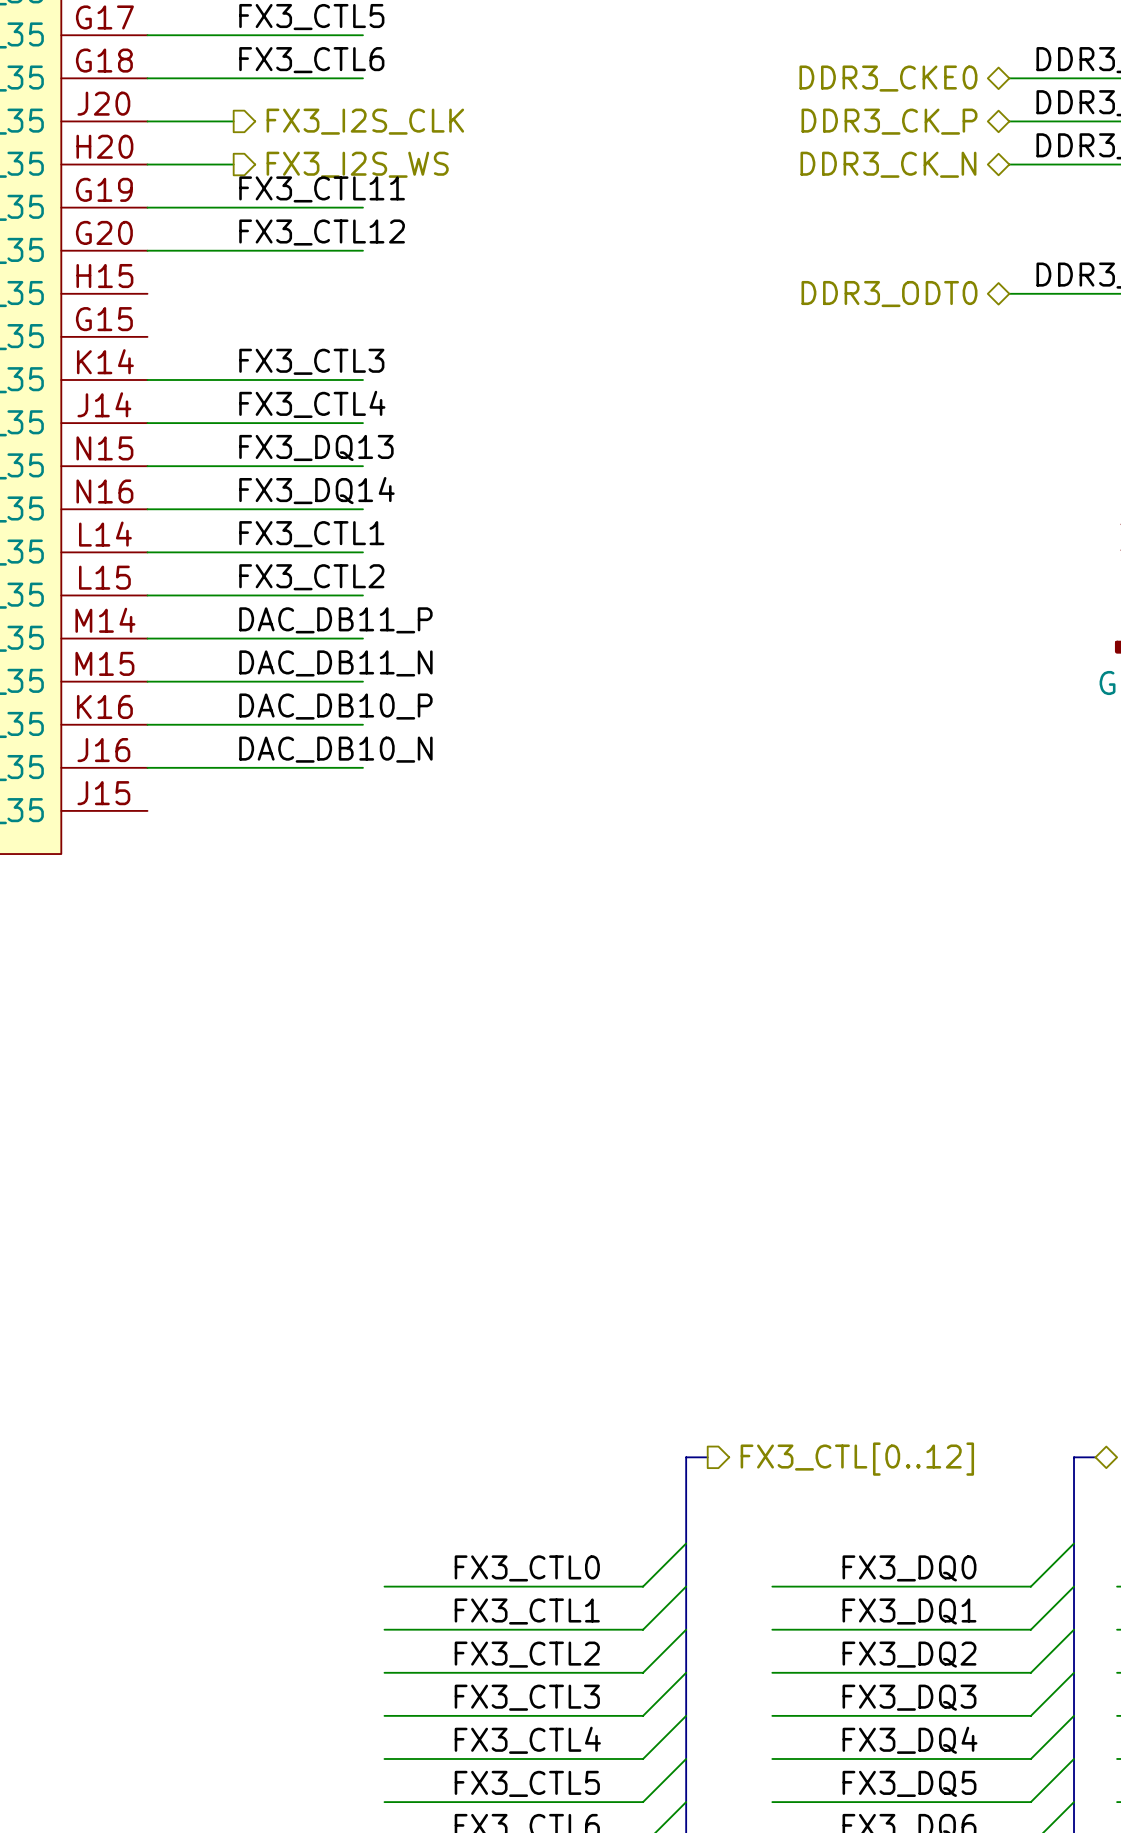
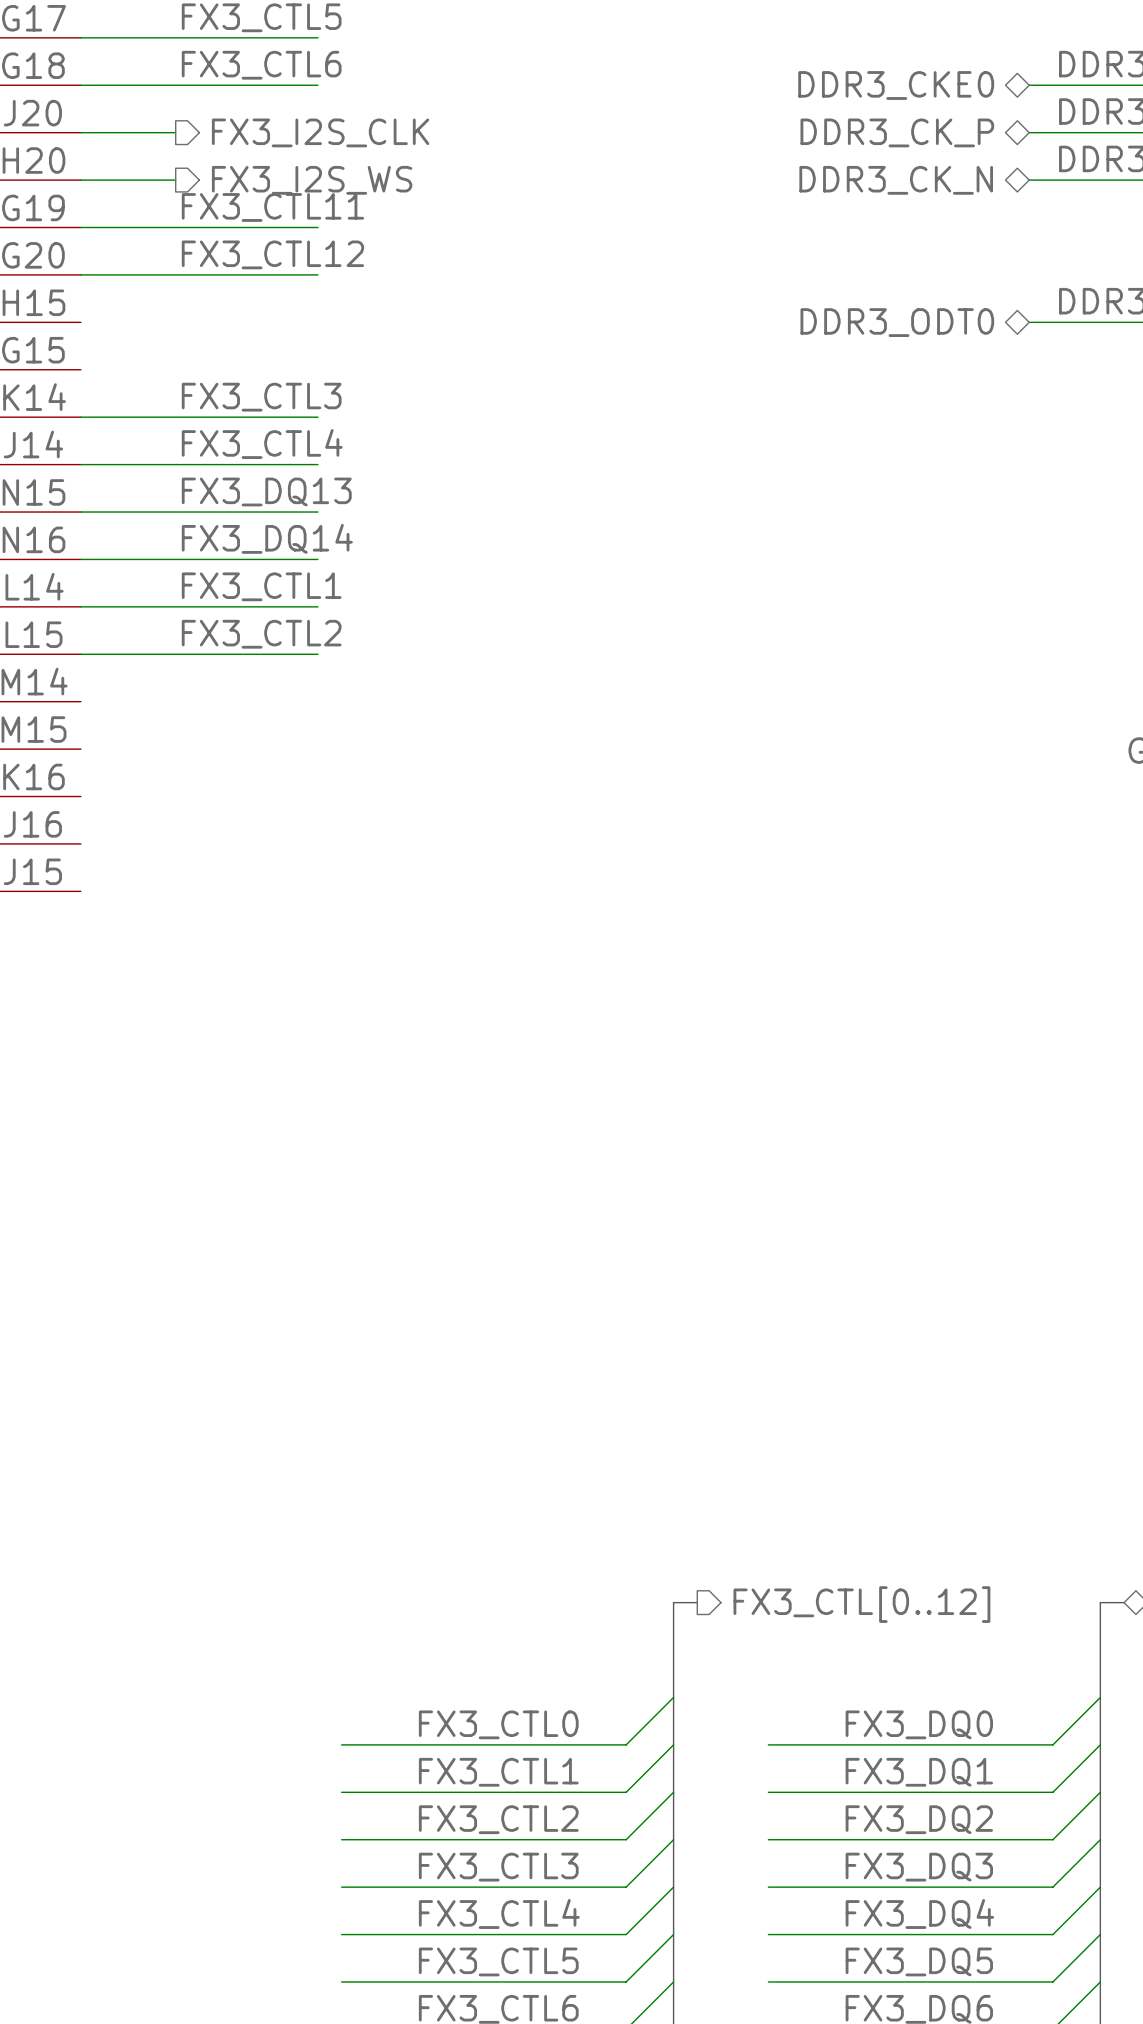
label: DAC_DB11_P (335, 620) -> none
wire: (147, 638) (362, 638) -> none
label: DAC_DB11_N (335, 663) -> none
wire: (147, 681) (362, 681) -> none
label: DAC_DB10_P (335, 706) -> none
wire: (147, 724) (362, 724) -> none
label: DAC_DB10_N (335, 749) -> none
wire: (147, 767) (362, 767) -> none

